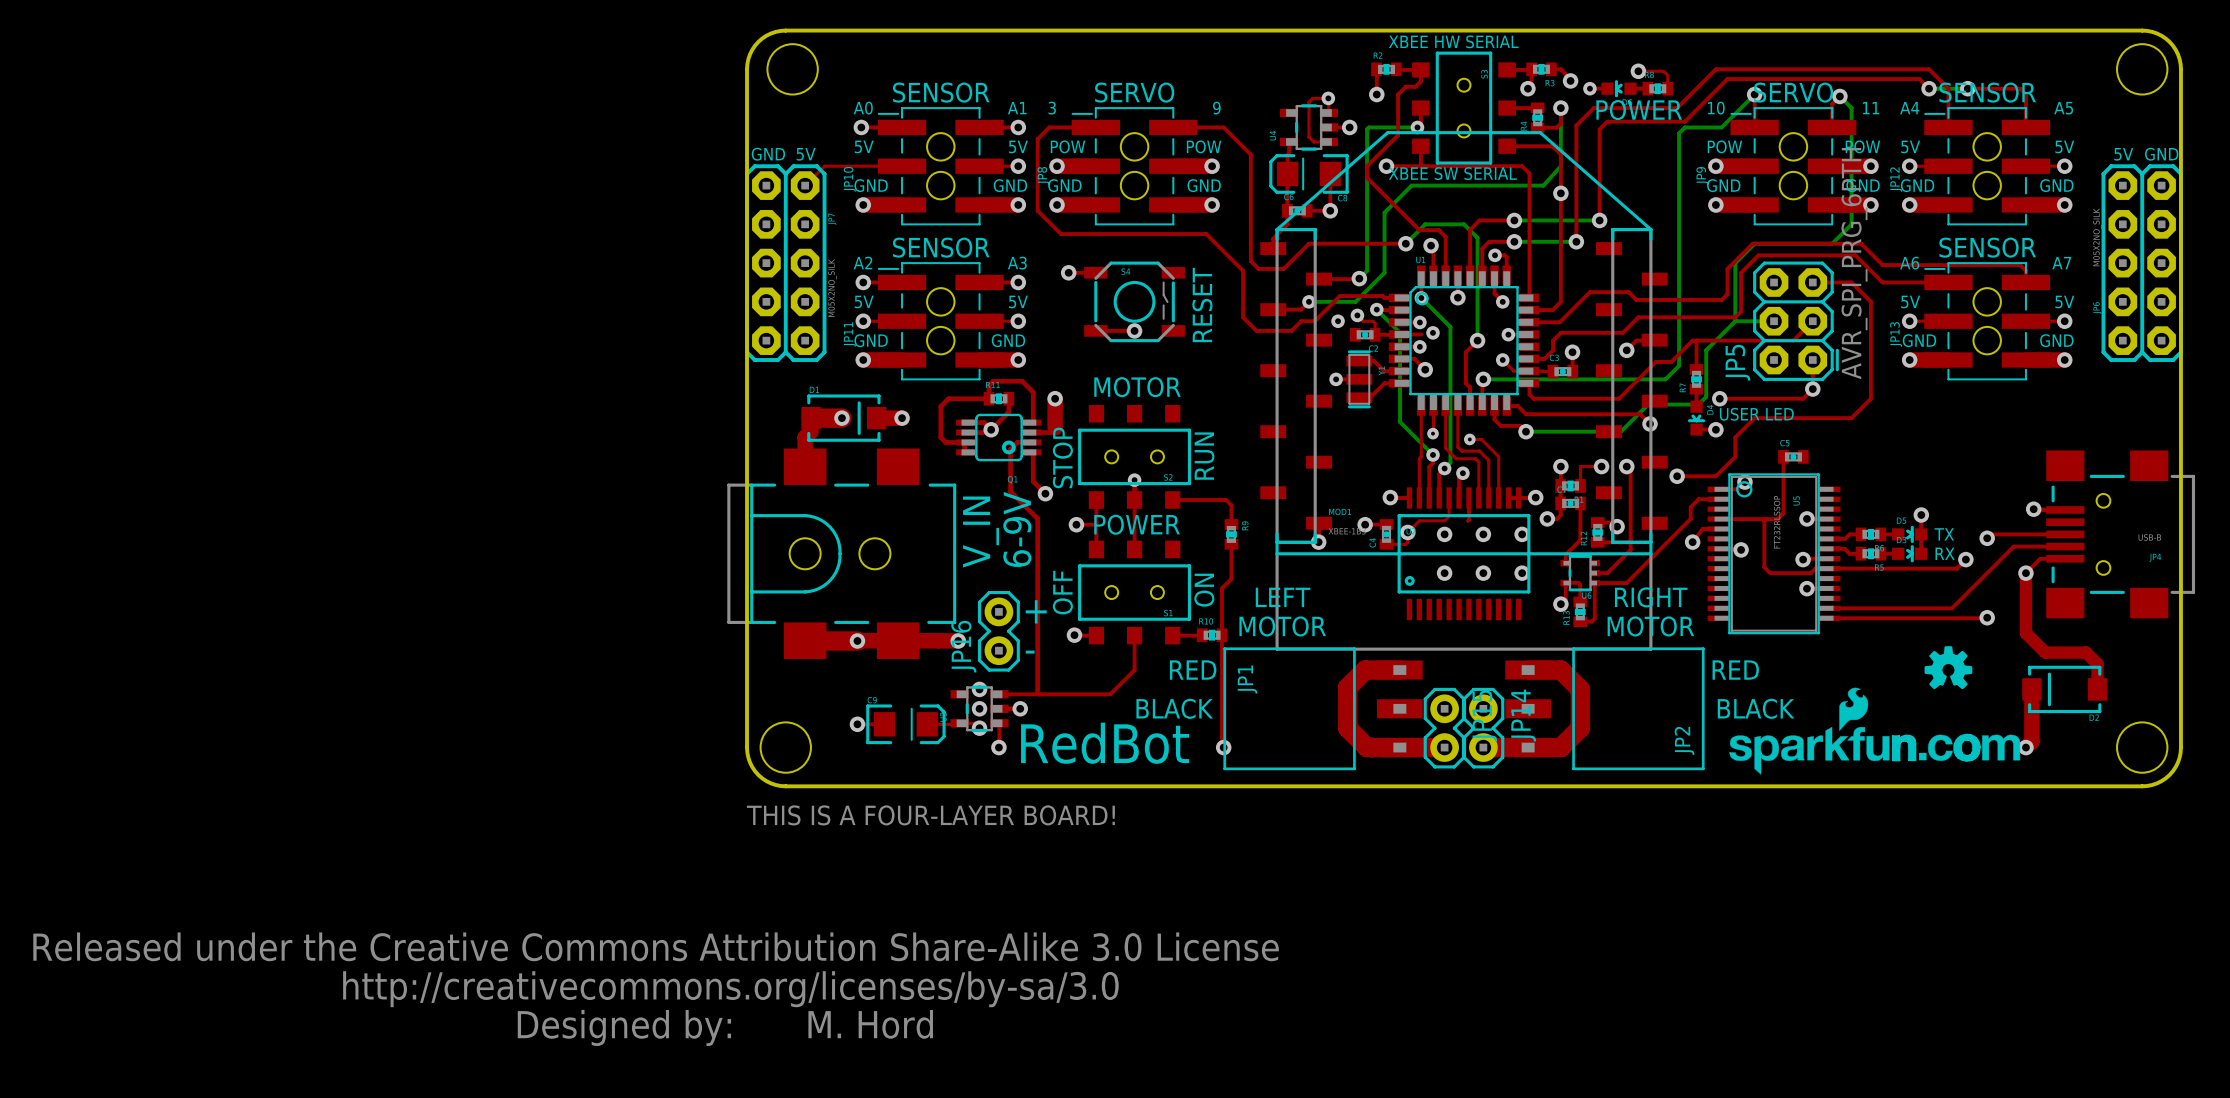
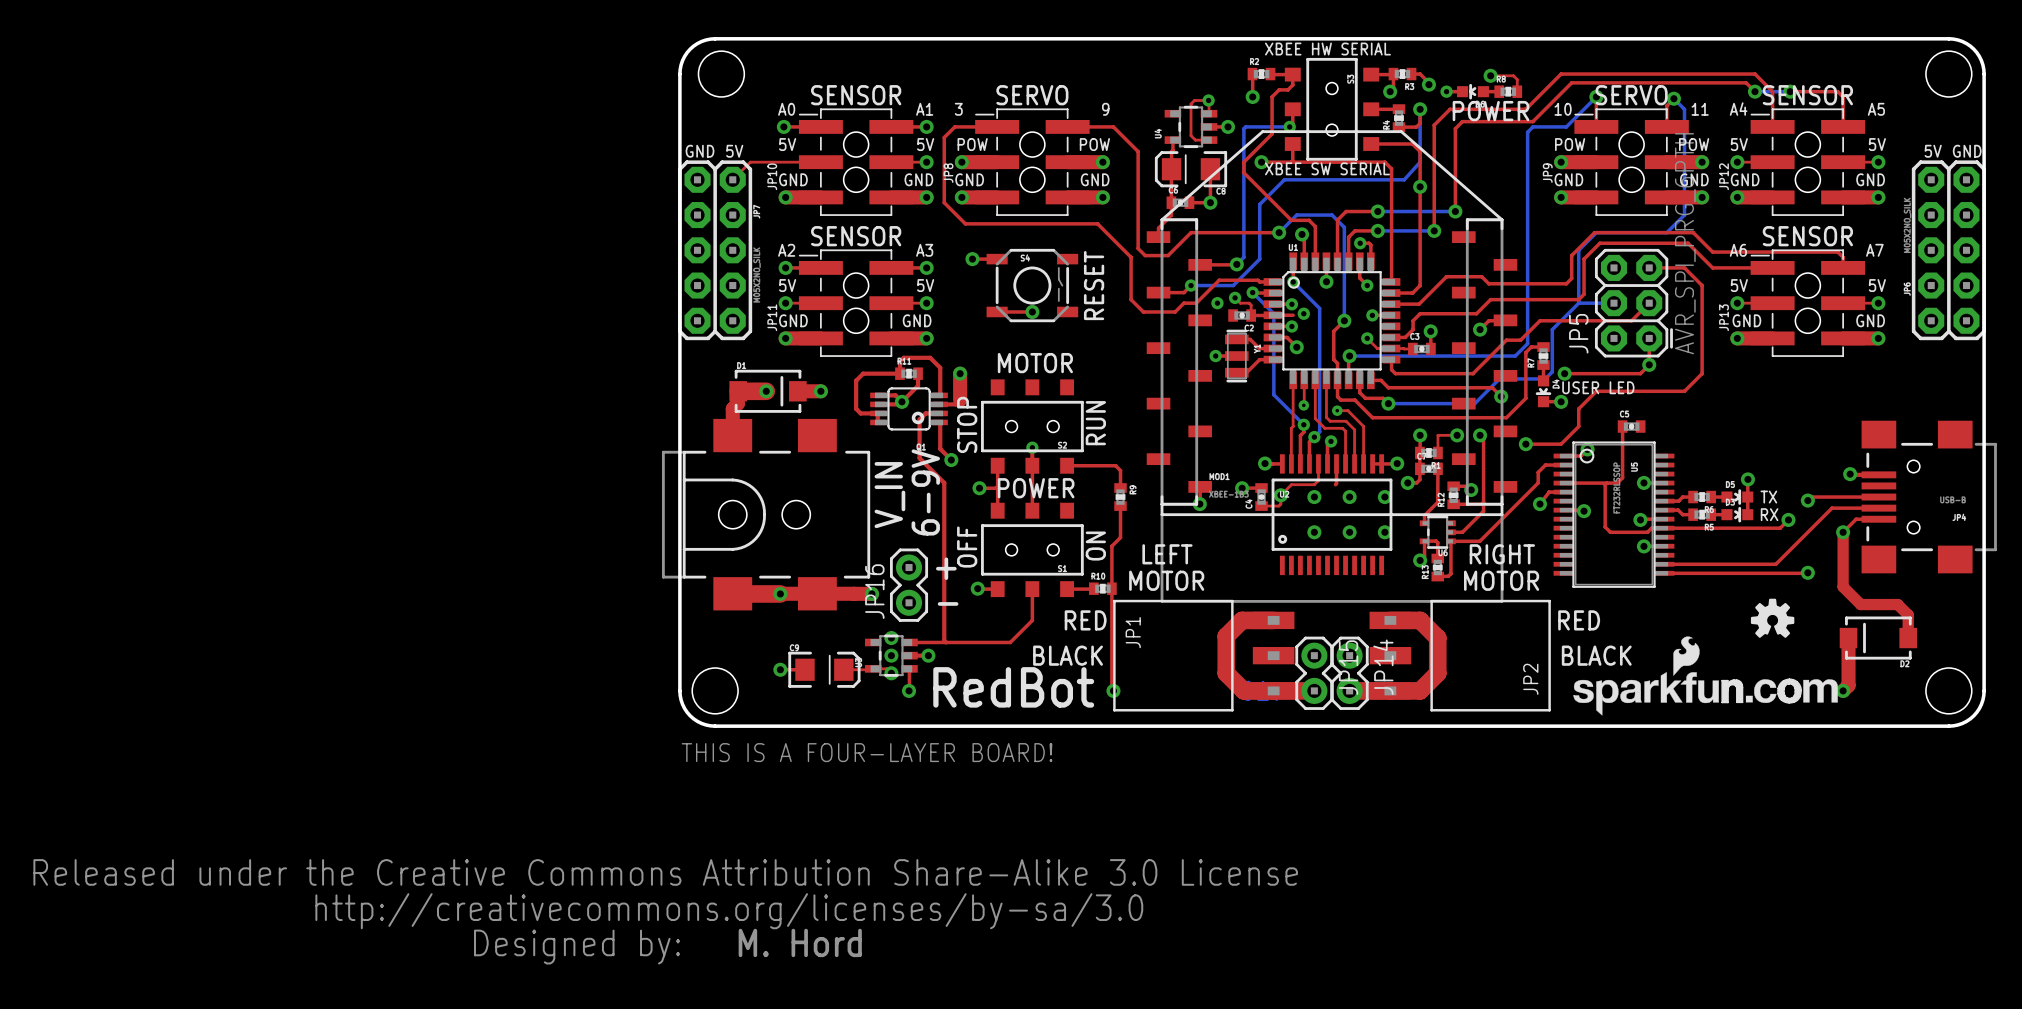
top track: (1696, 340) (1696, 369) -> (1337, 380) (1337, 396) (1340, 400) (1354, 400) (1372, 417) (1506, 417) (1525, 398) (1525, 352) (1531, 347) (1543, 347)

